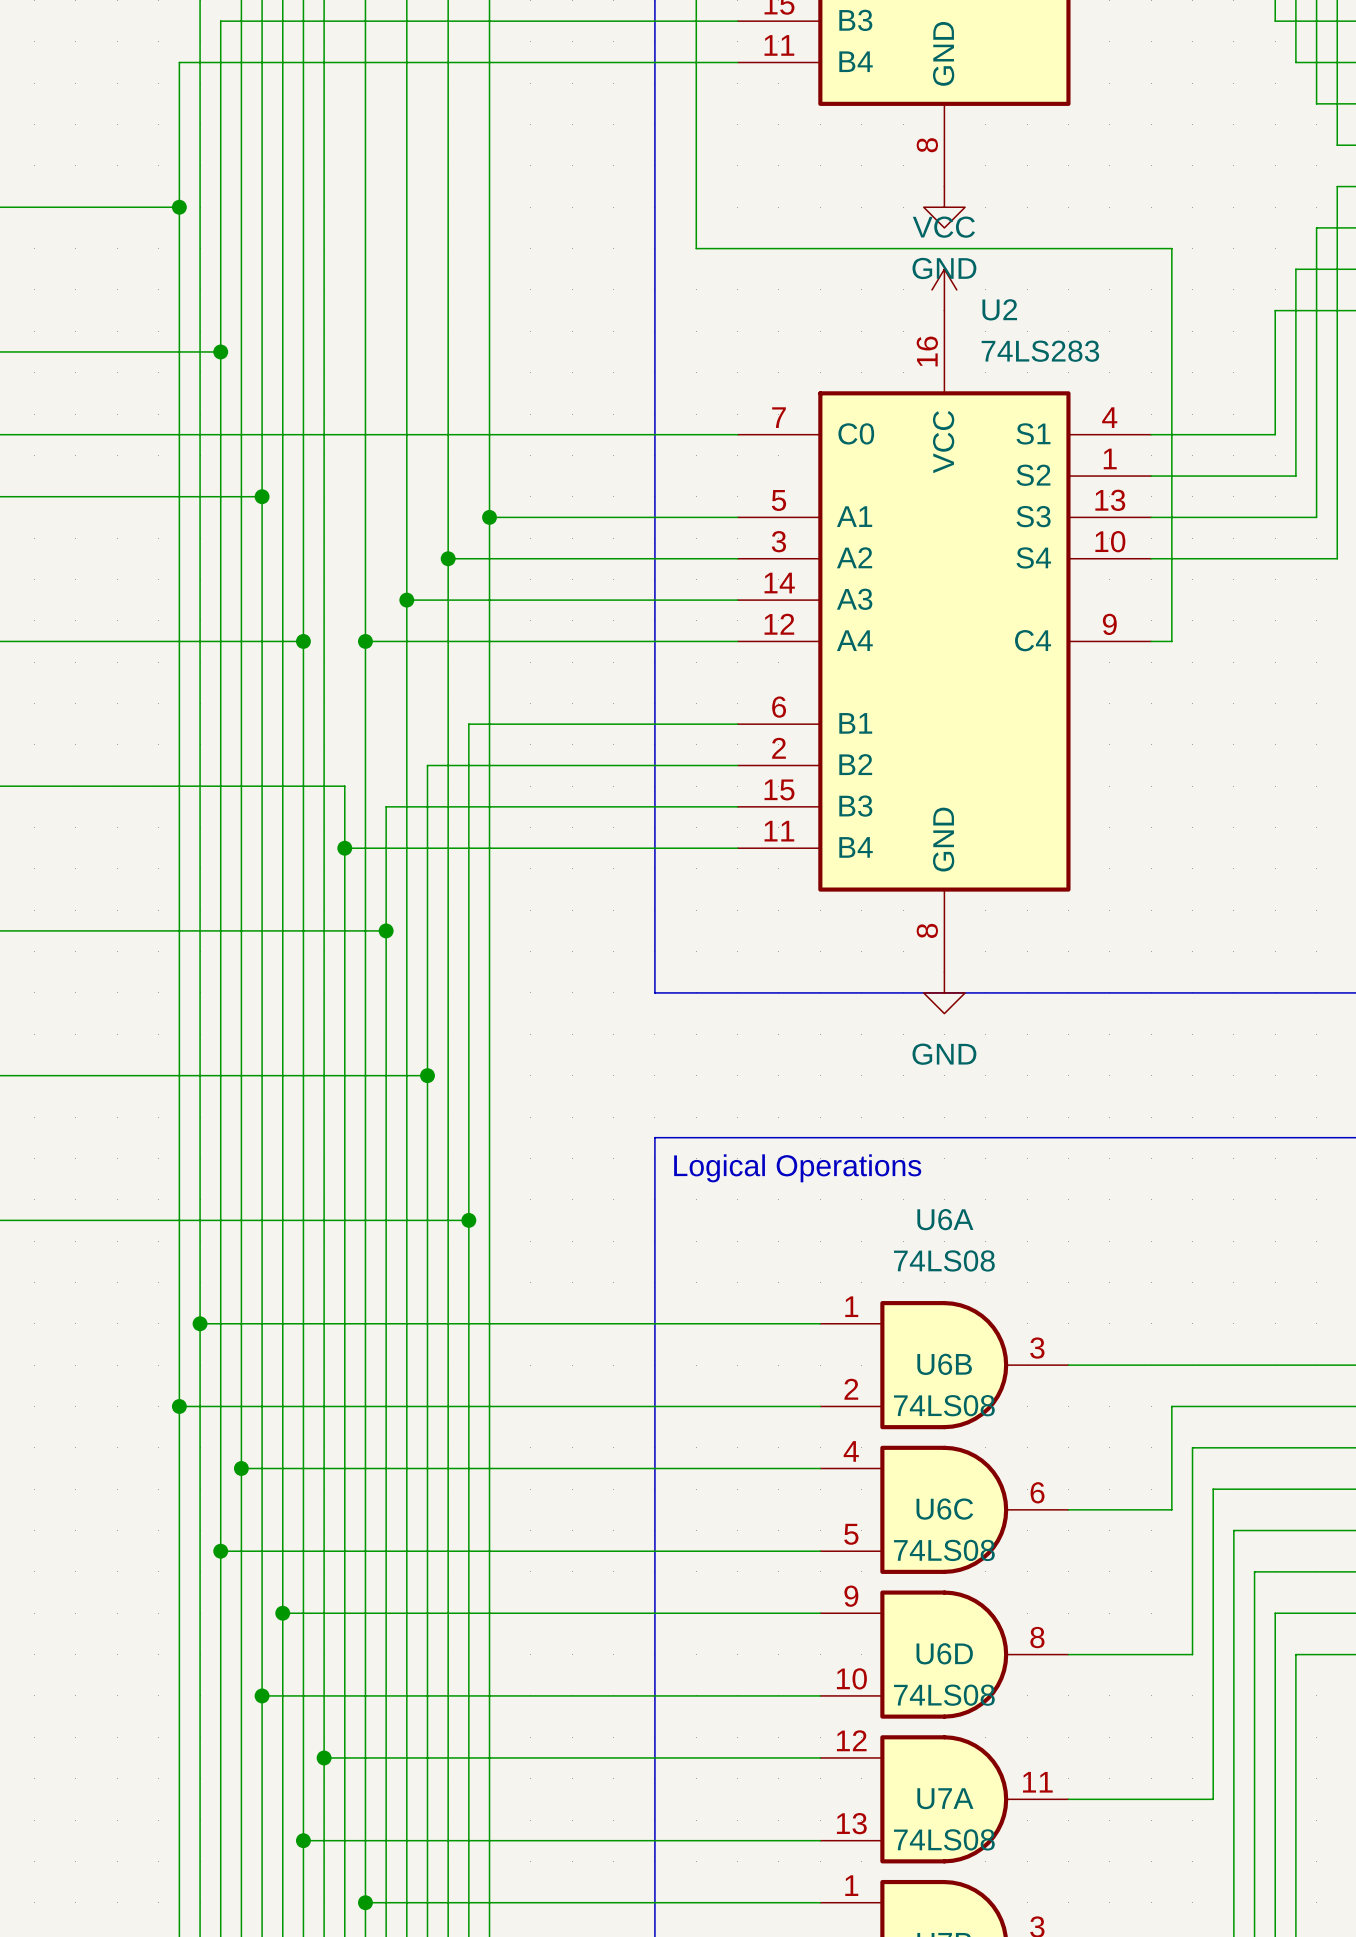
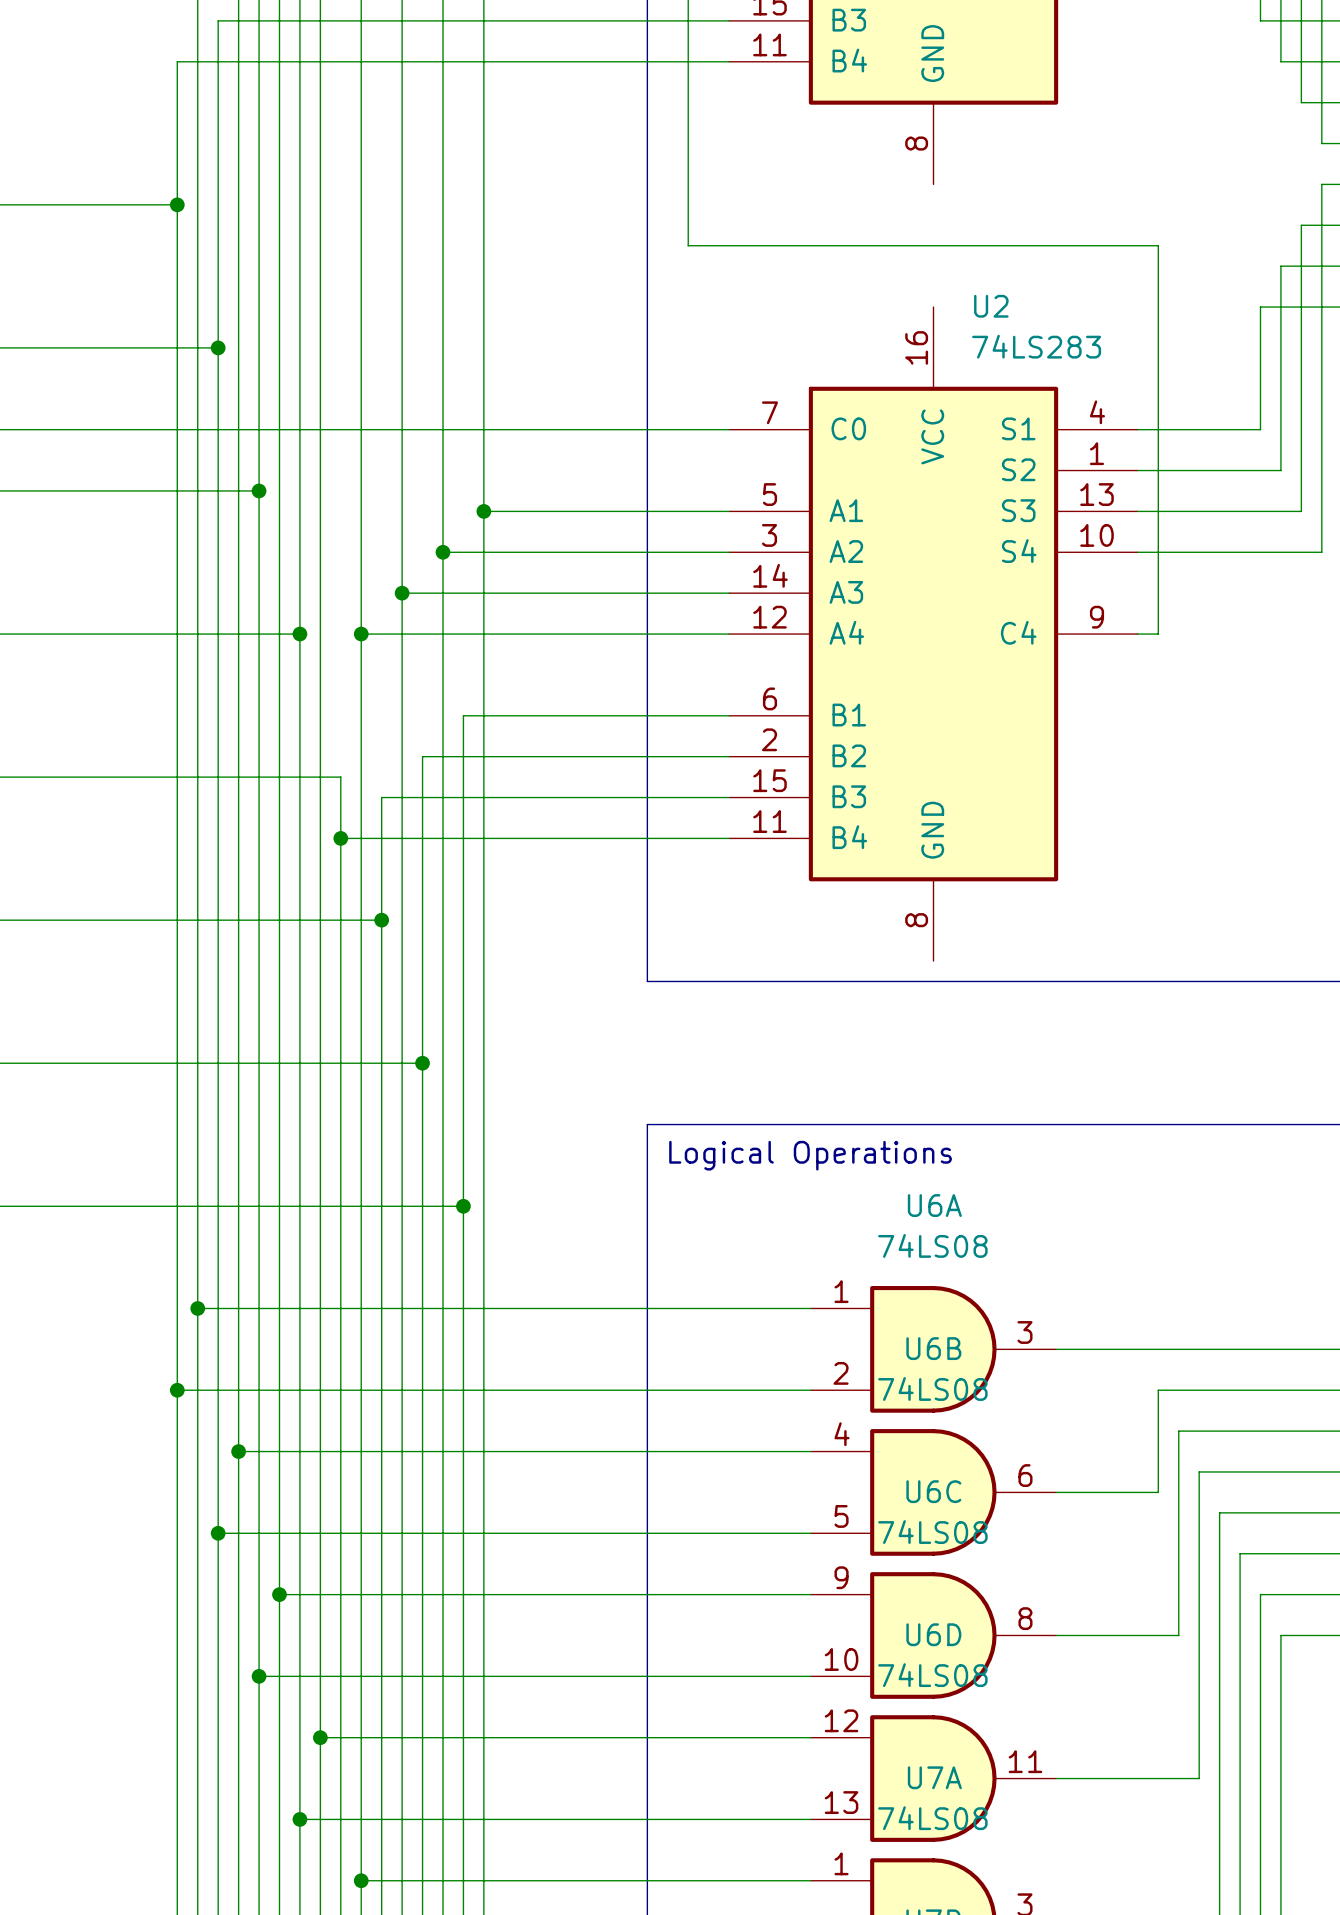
power symbol: GND (944, 207) -> none
power symbol: VCC (944, 289) -> none
power symbol: GND (944, 992) -> none

